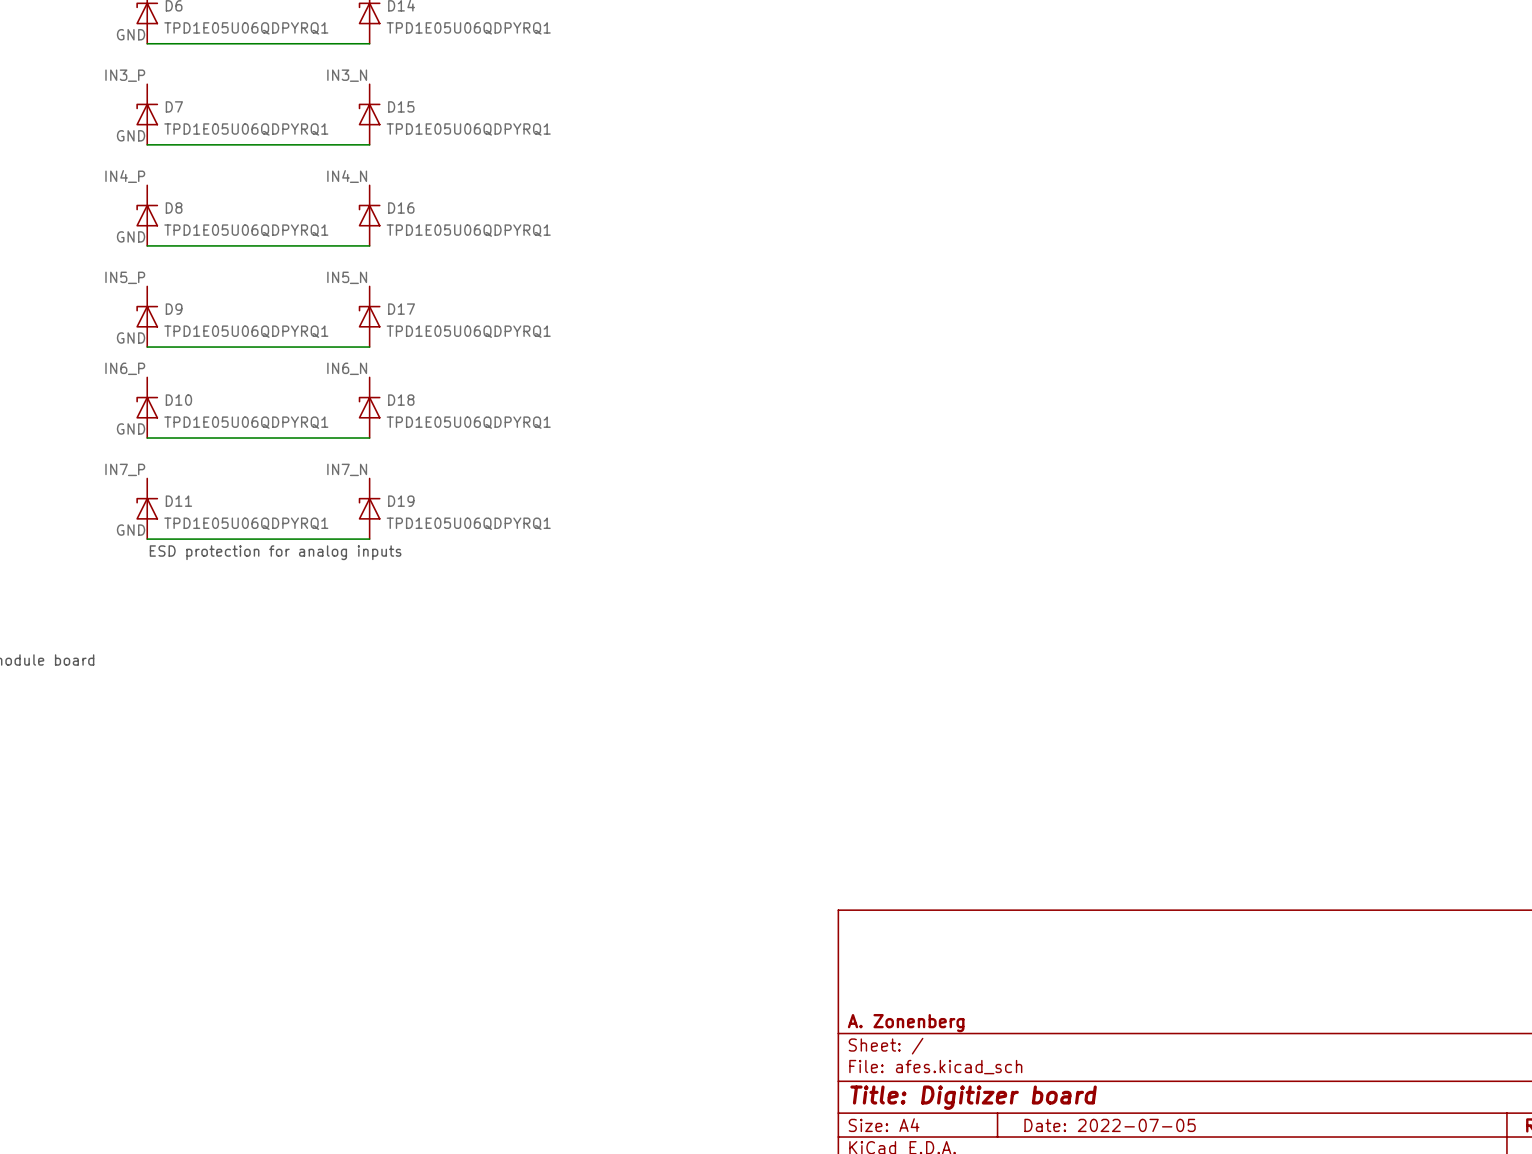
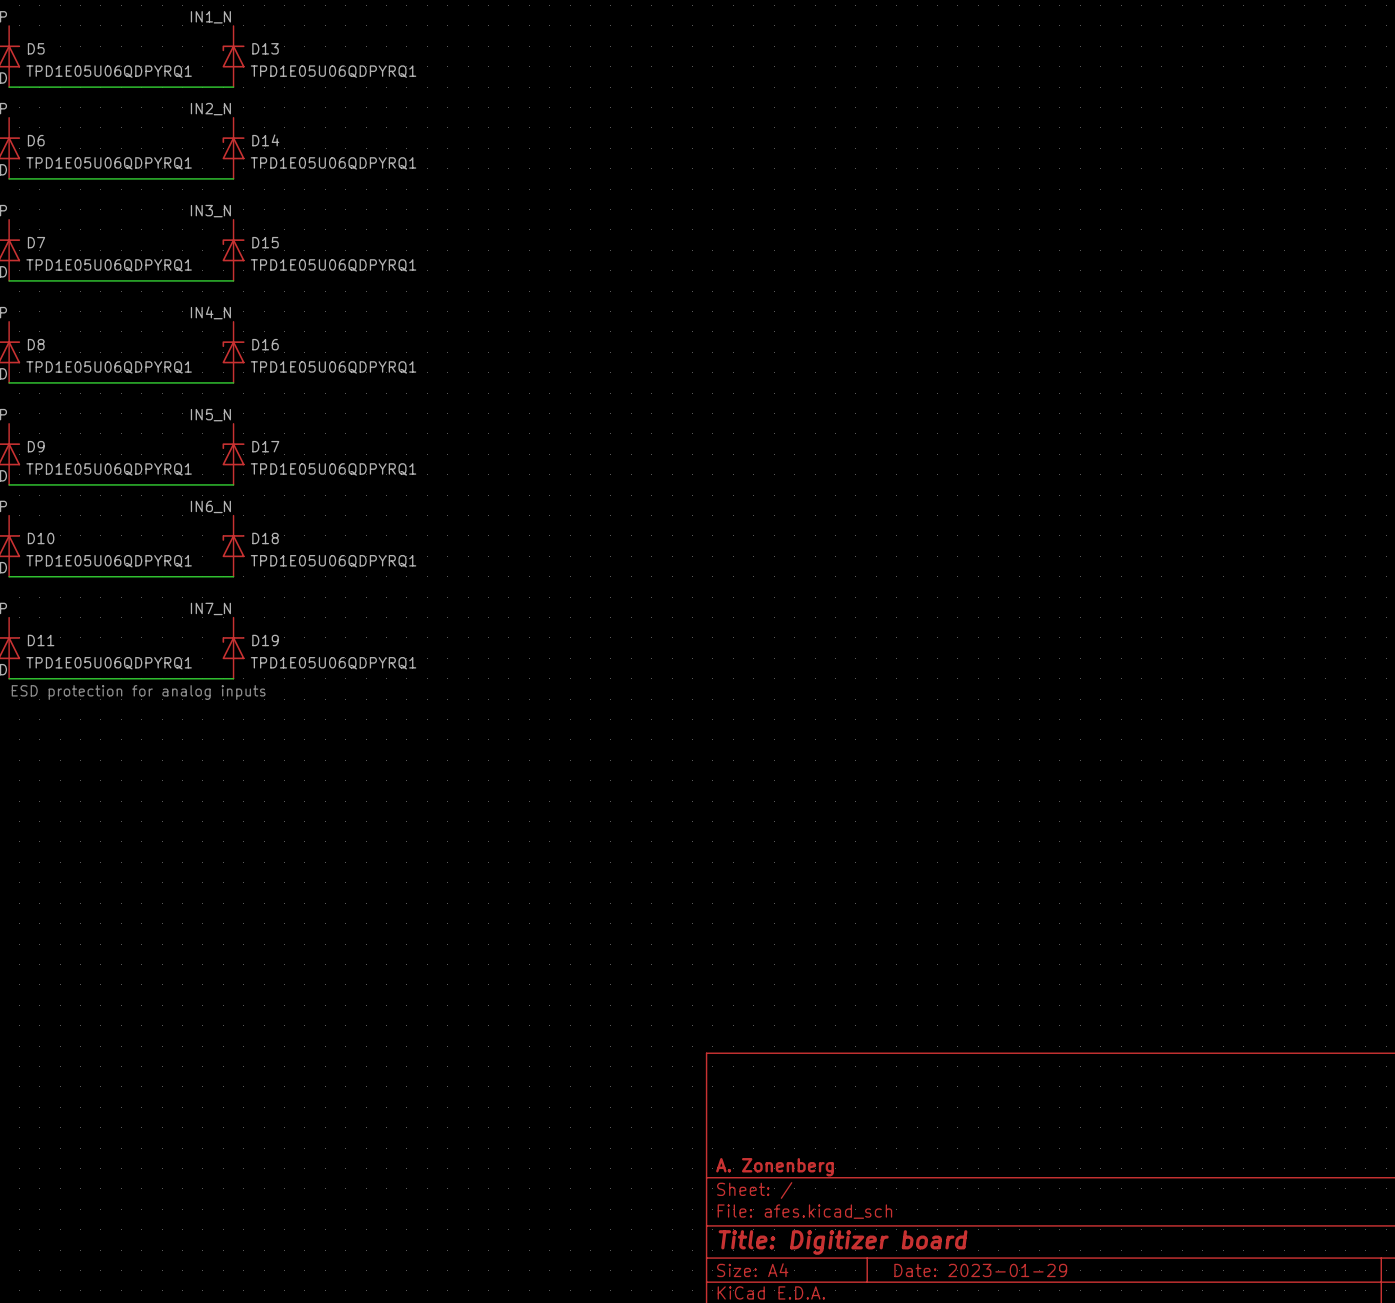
title block: Date: 2022-07-05 (1110, 1125) -> Date: 2023-01-29 (980, 1270)

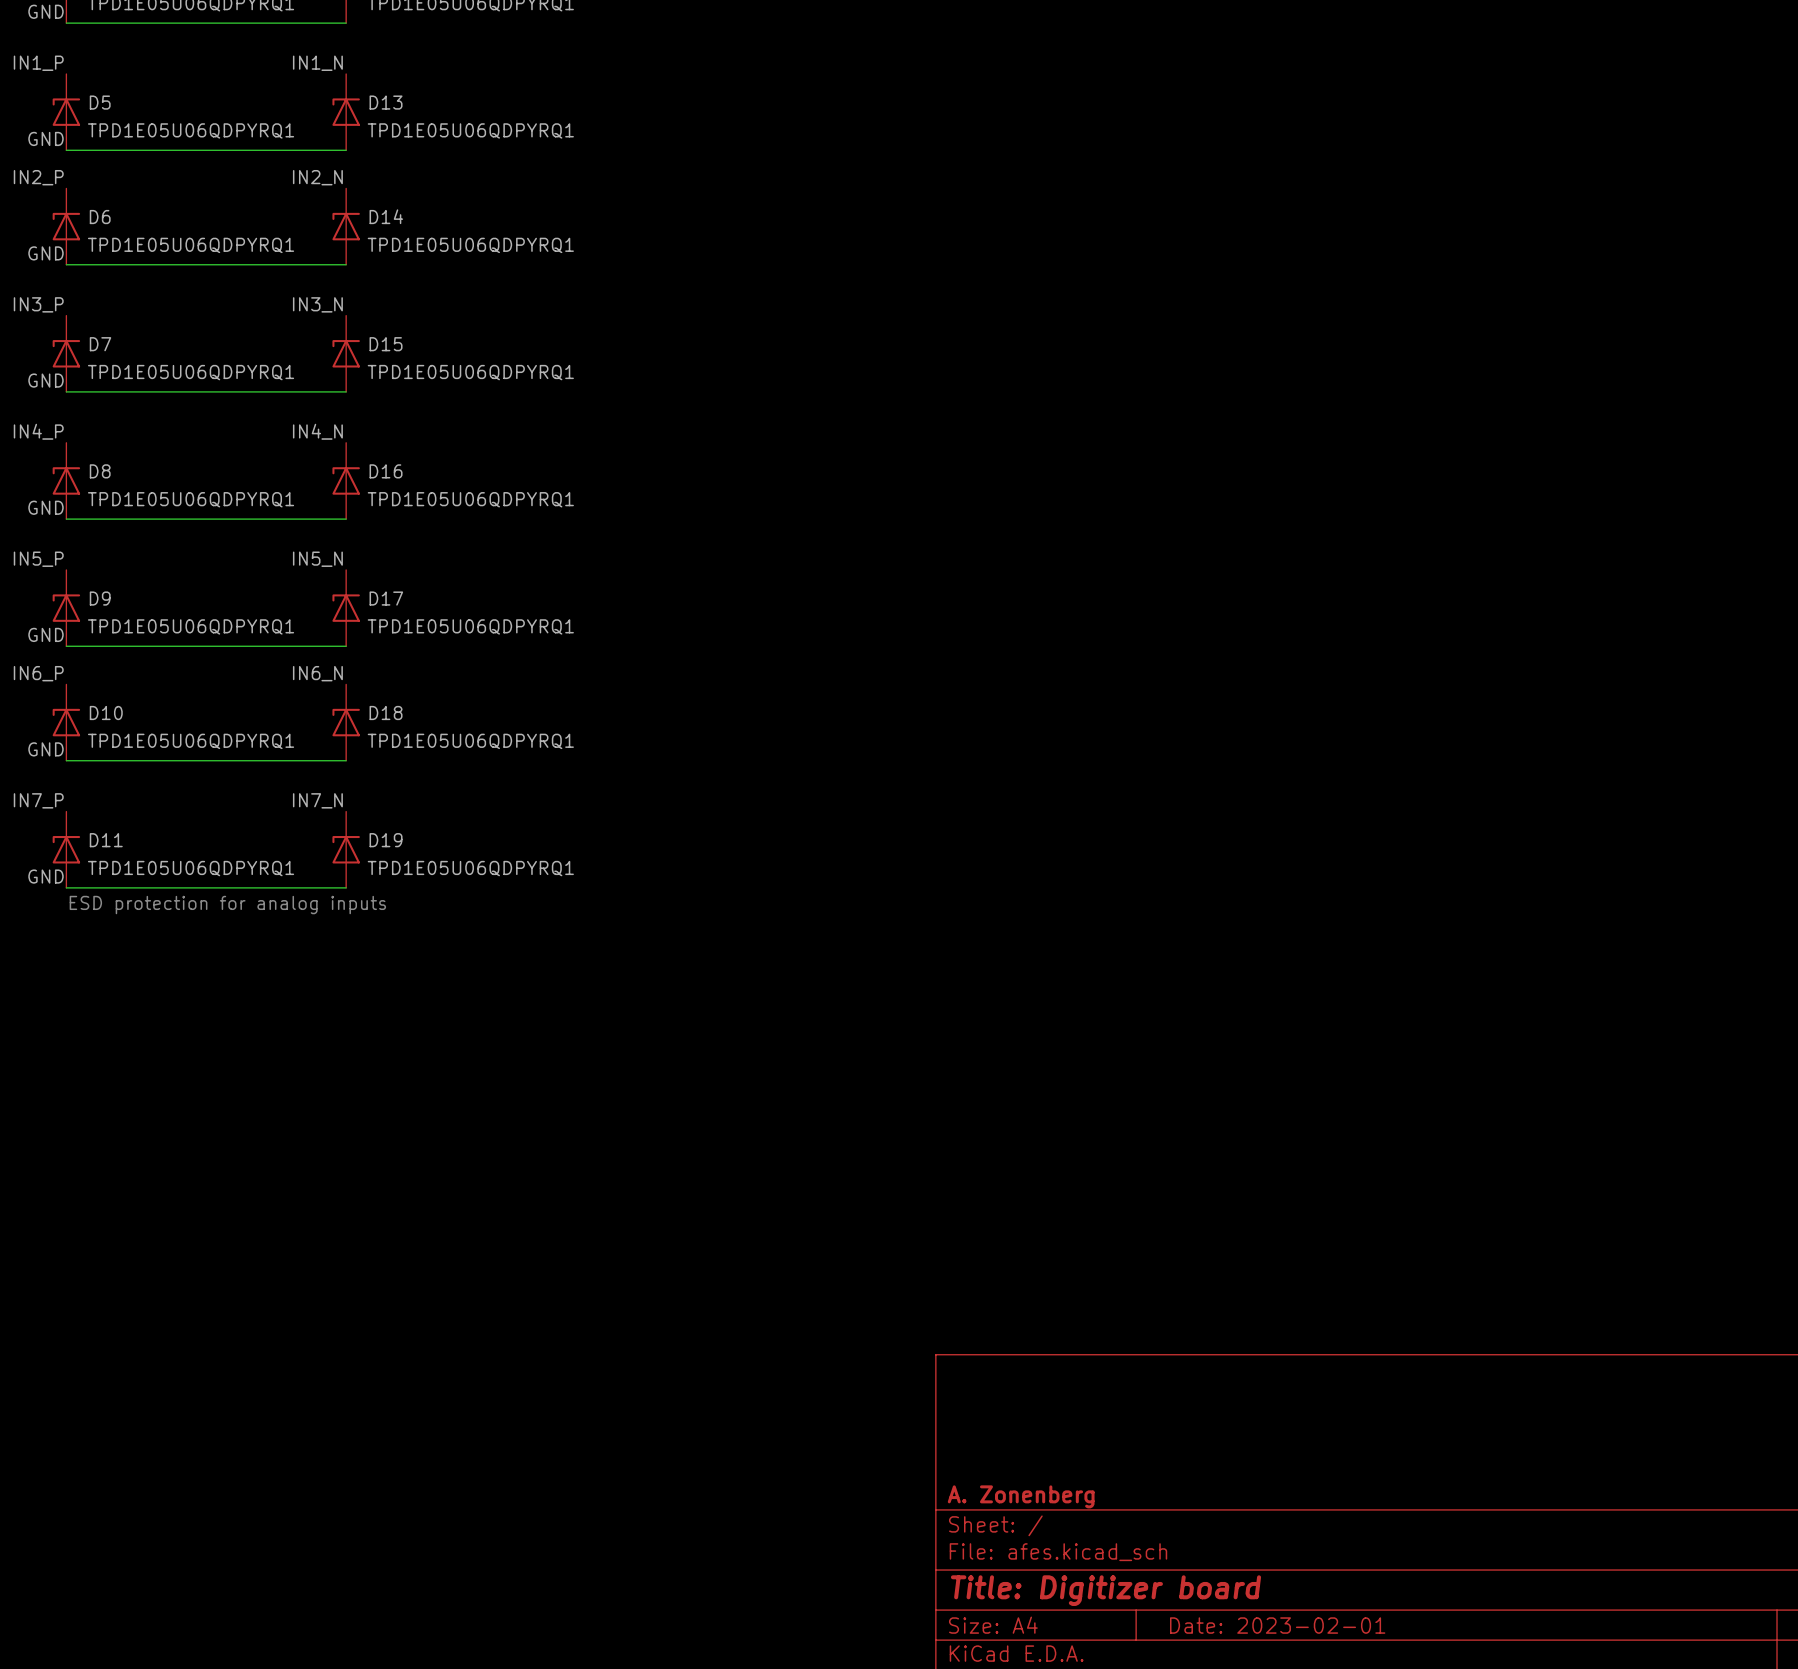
title block: Date: 2023-01-29 (980, 1270) -> Date: 2023-02-01 (1277, 1625)

